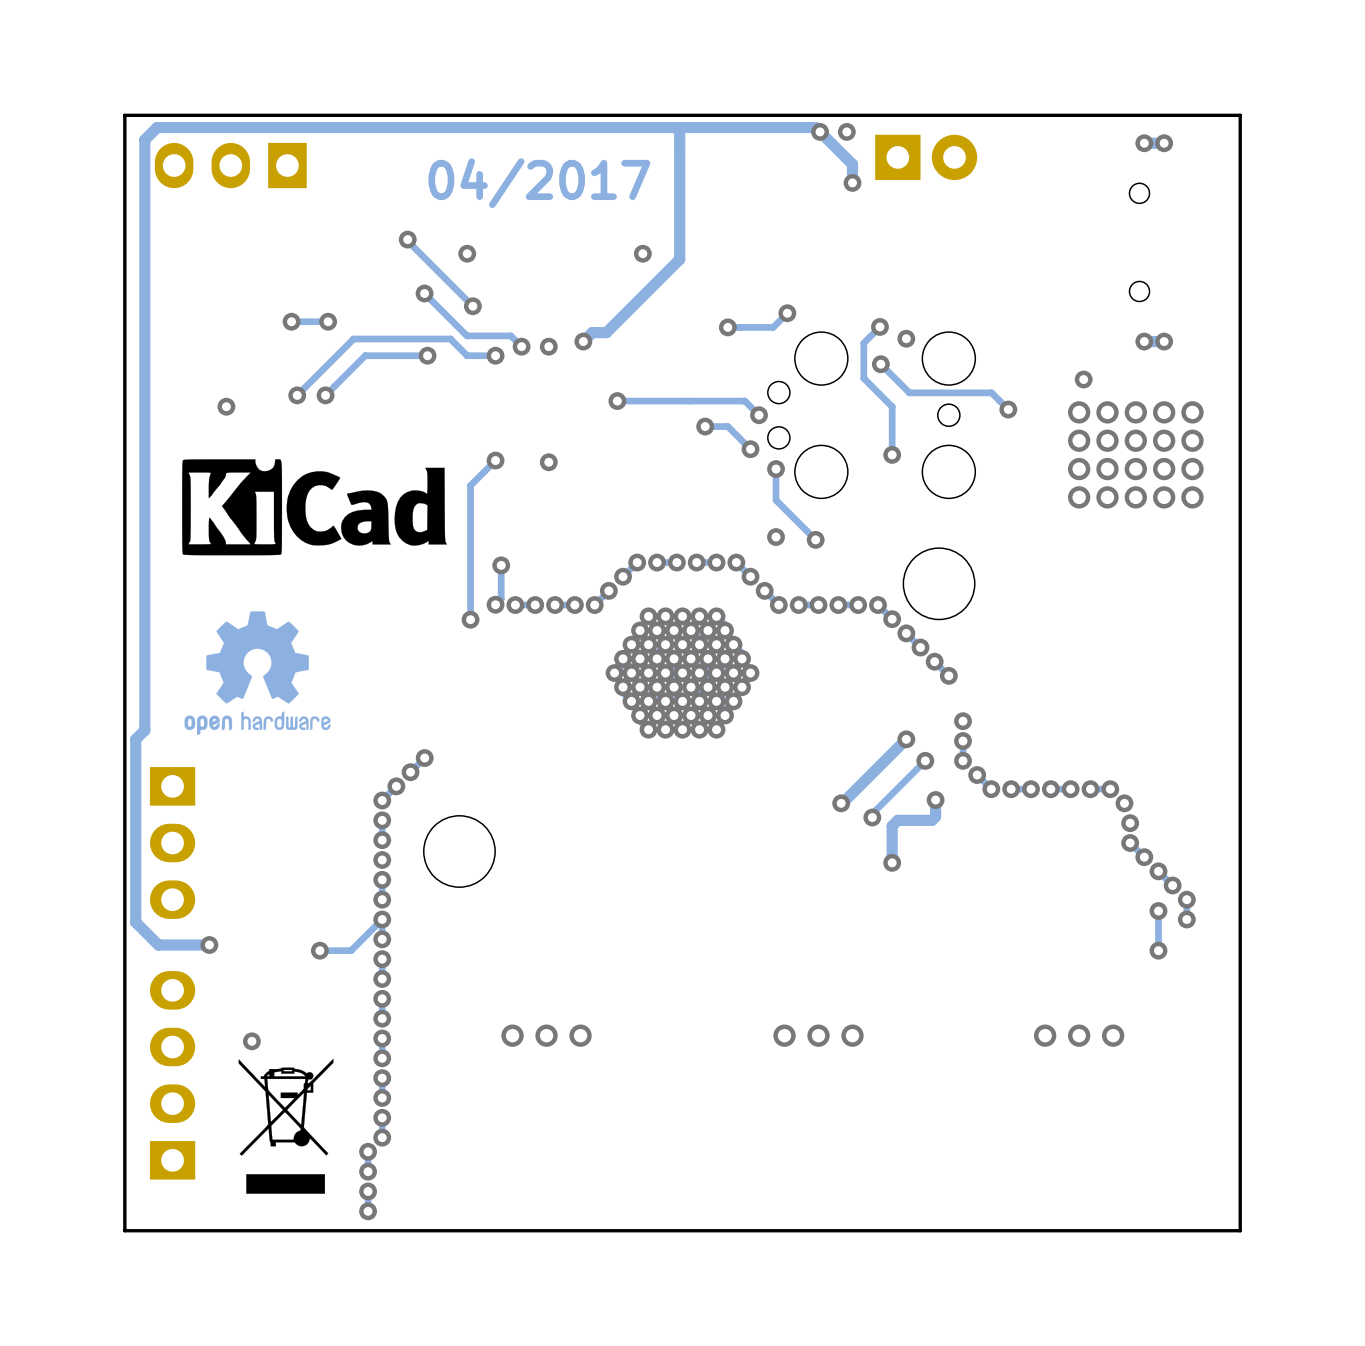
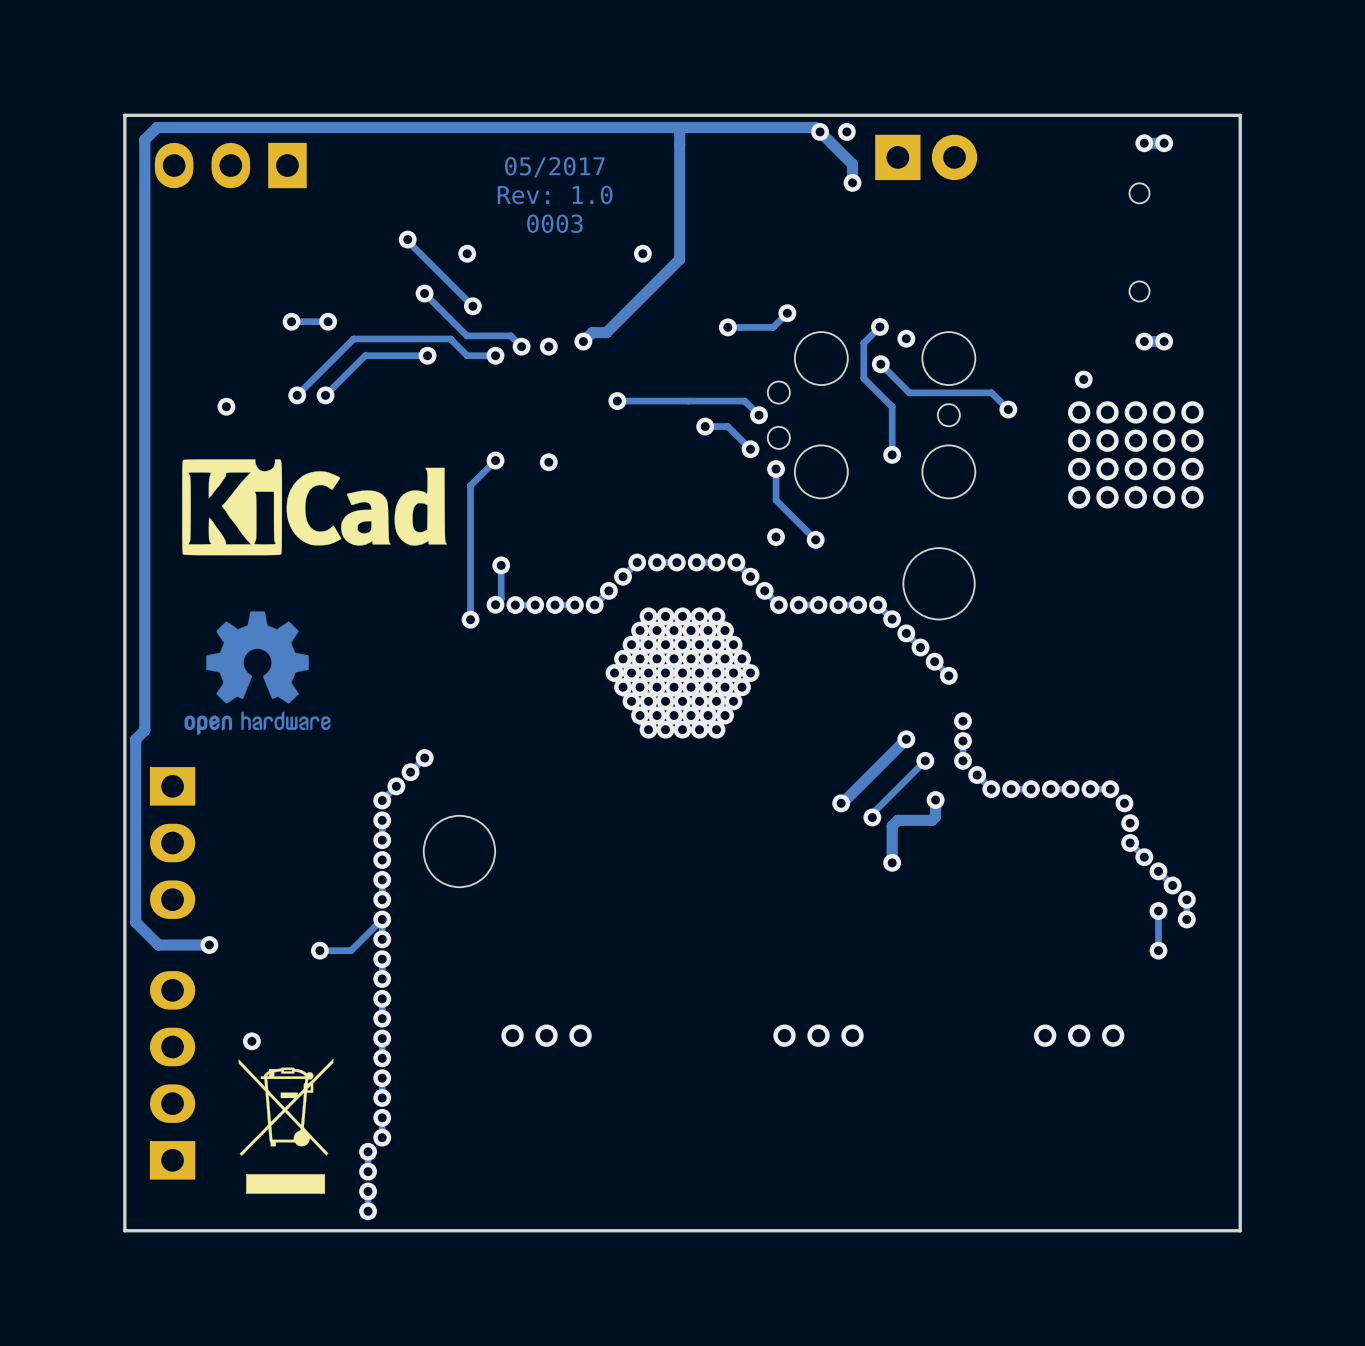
text: 04/2017 (539, 183) -> 05/2017 (554, 167)
text: none -> Rev: 1.0 (555, 195)
text: none -> 0003 (554, 223)

